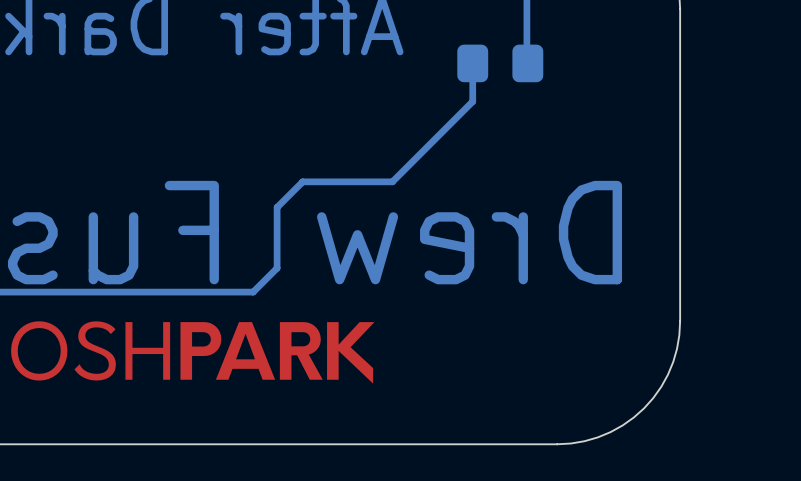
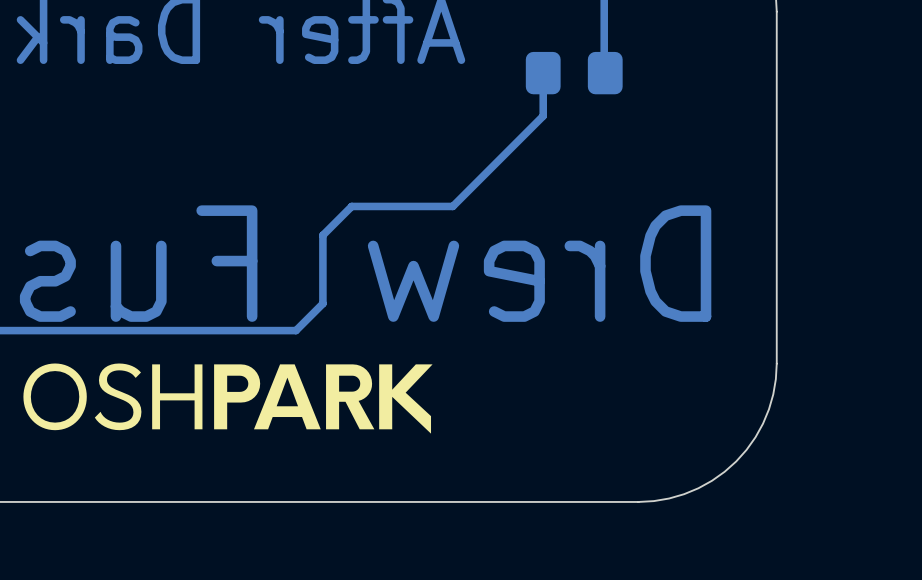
drawing shape: [11, 321, 375, 384] -> [23, 363, 433, 434]

